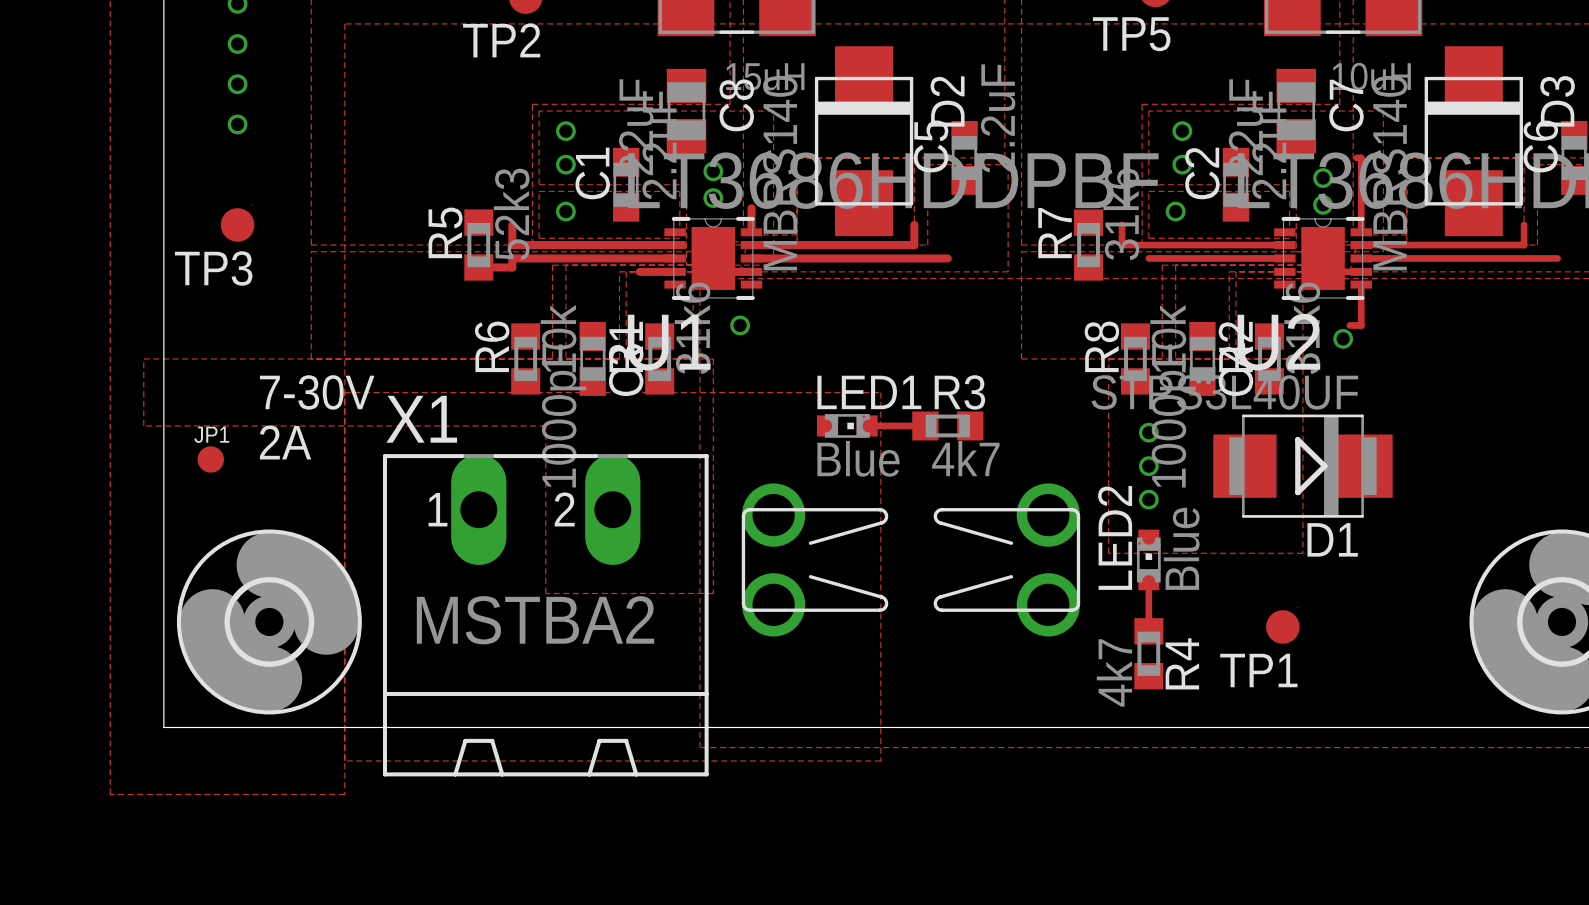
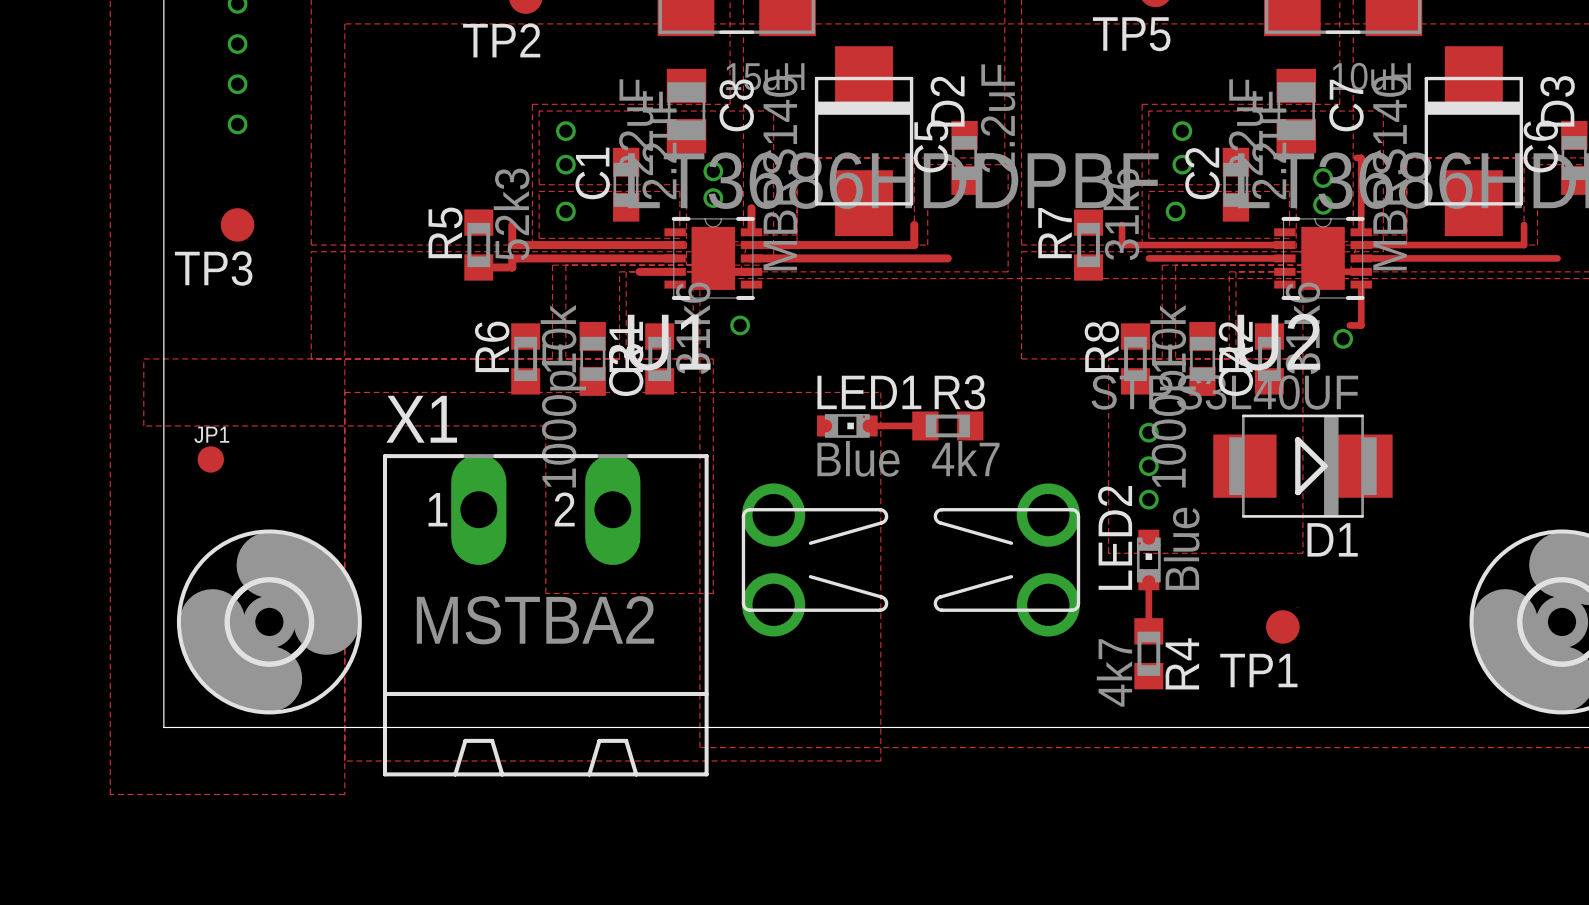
text: 7-30V (317, 392) -> none
text: 2A (285, 442) -> none

